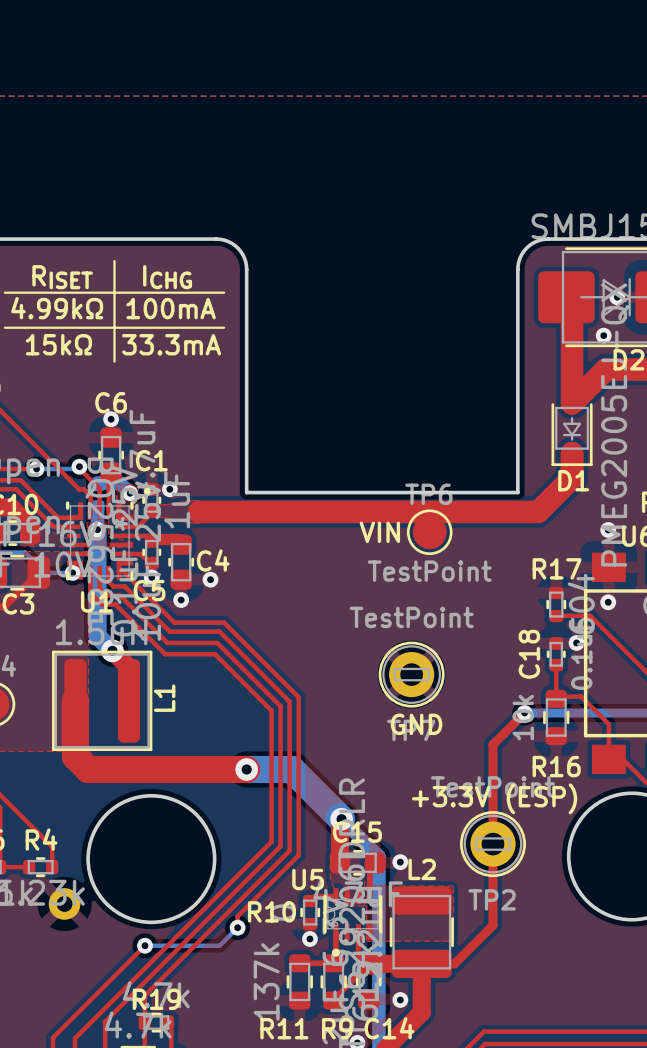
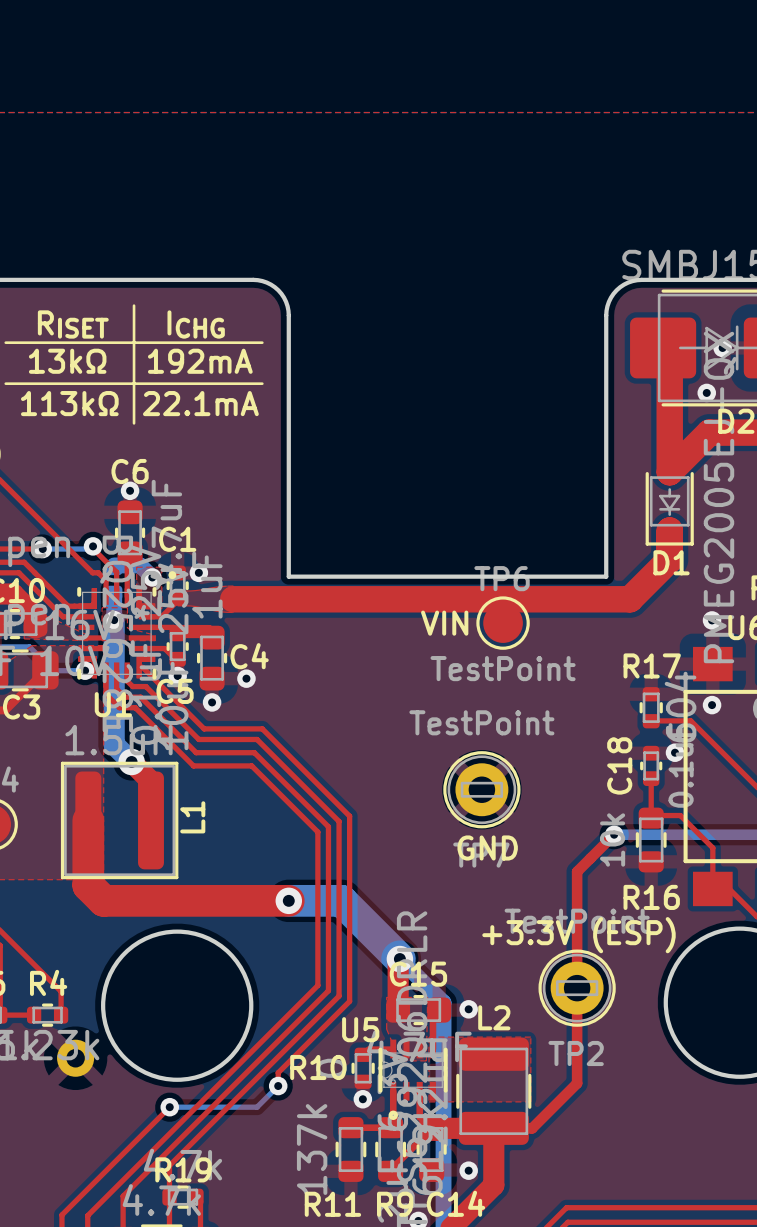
text: 4.99kΩ (57, 308) -> 13kΩ (67, 361)
text: 100mA (171, 308) -> 192mA (200, 361)
text: 15kΩ (58, 344) -> 113kΩ (69, 403)
text: 33.3mA (171, 344) -> 22.1mA (200, 403)

